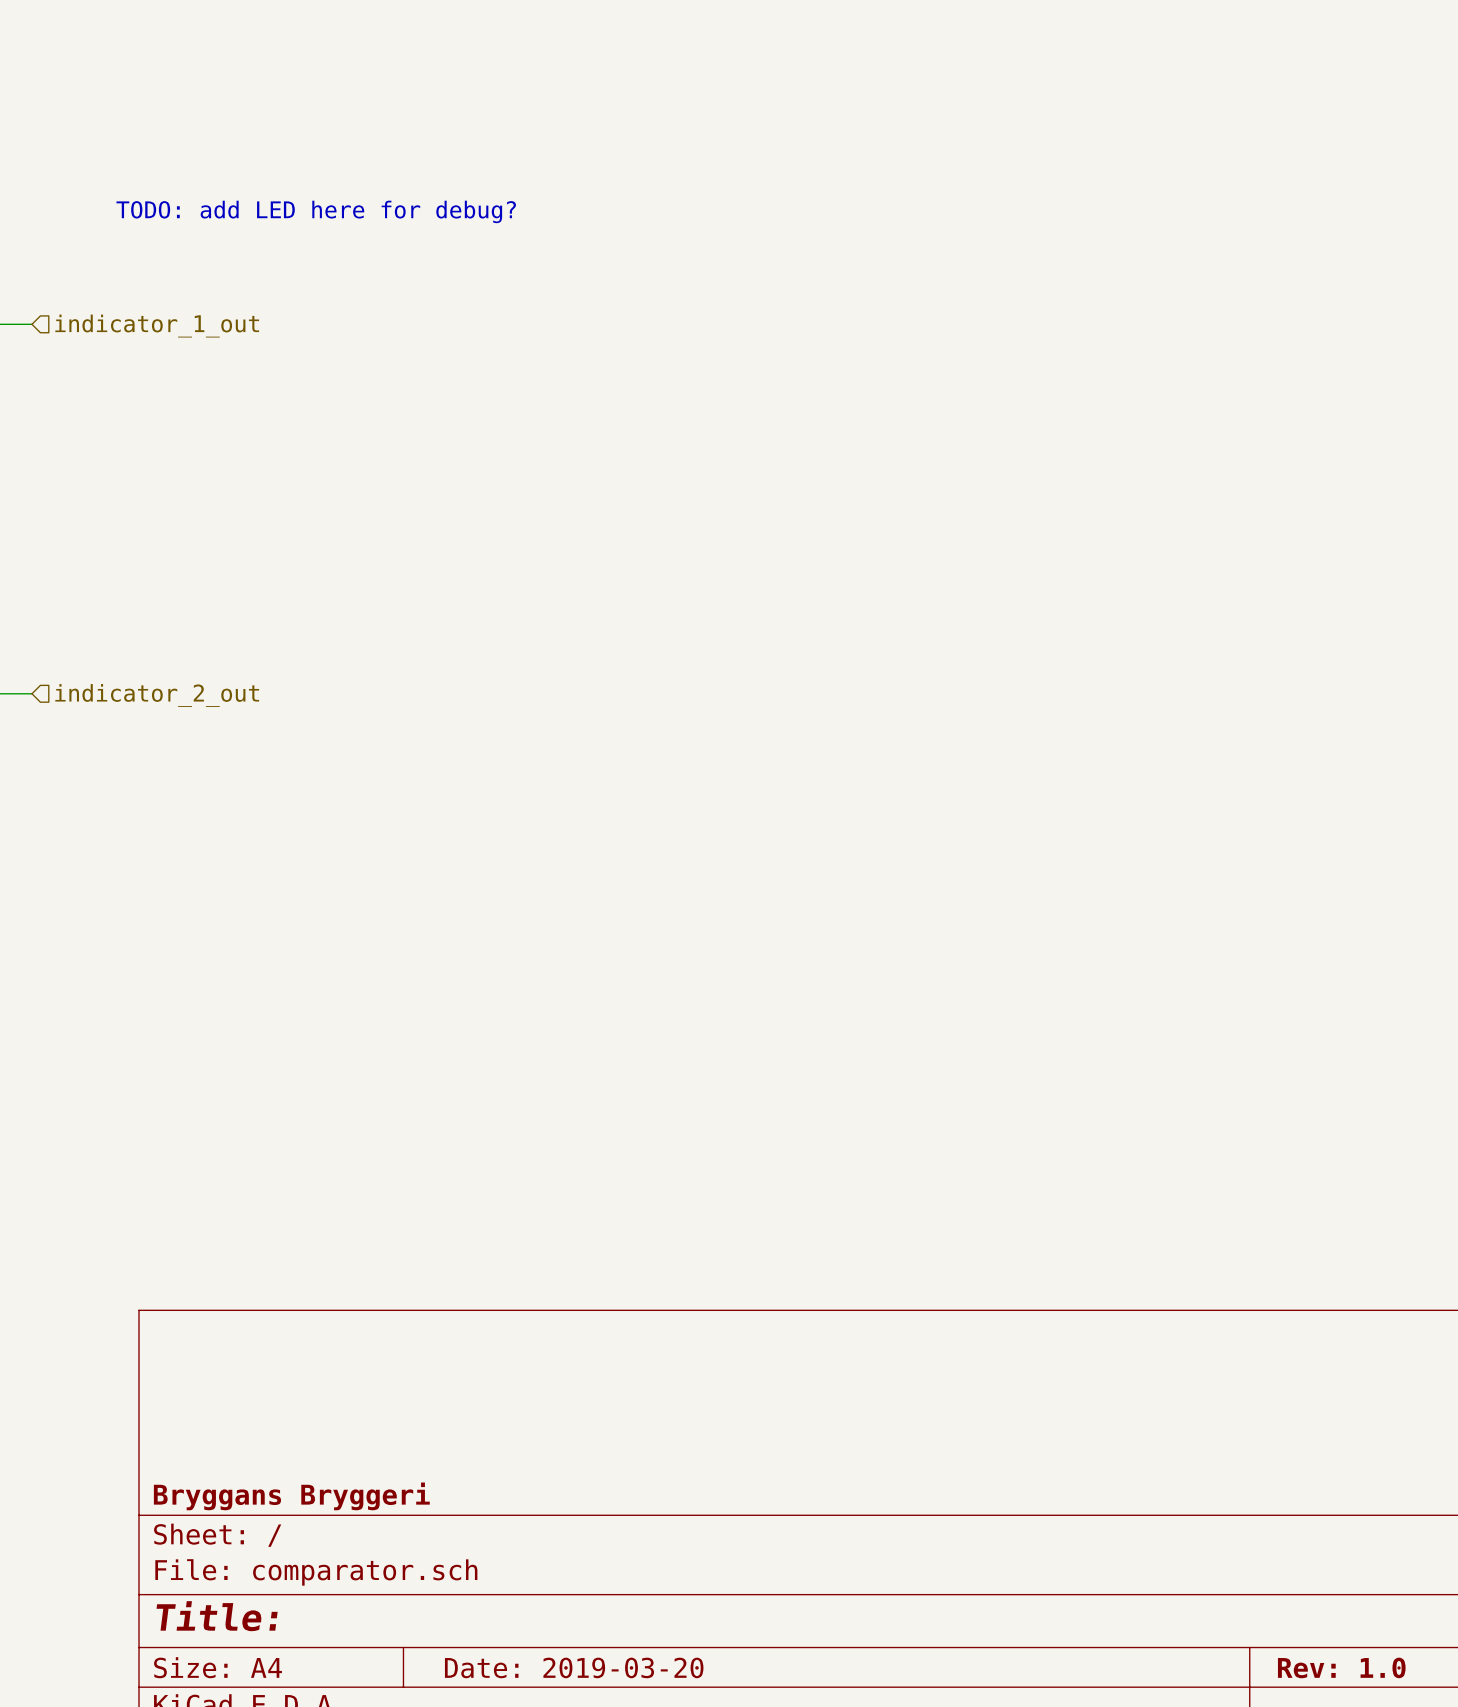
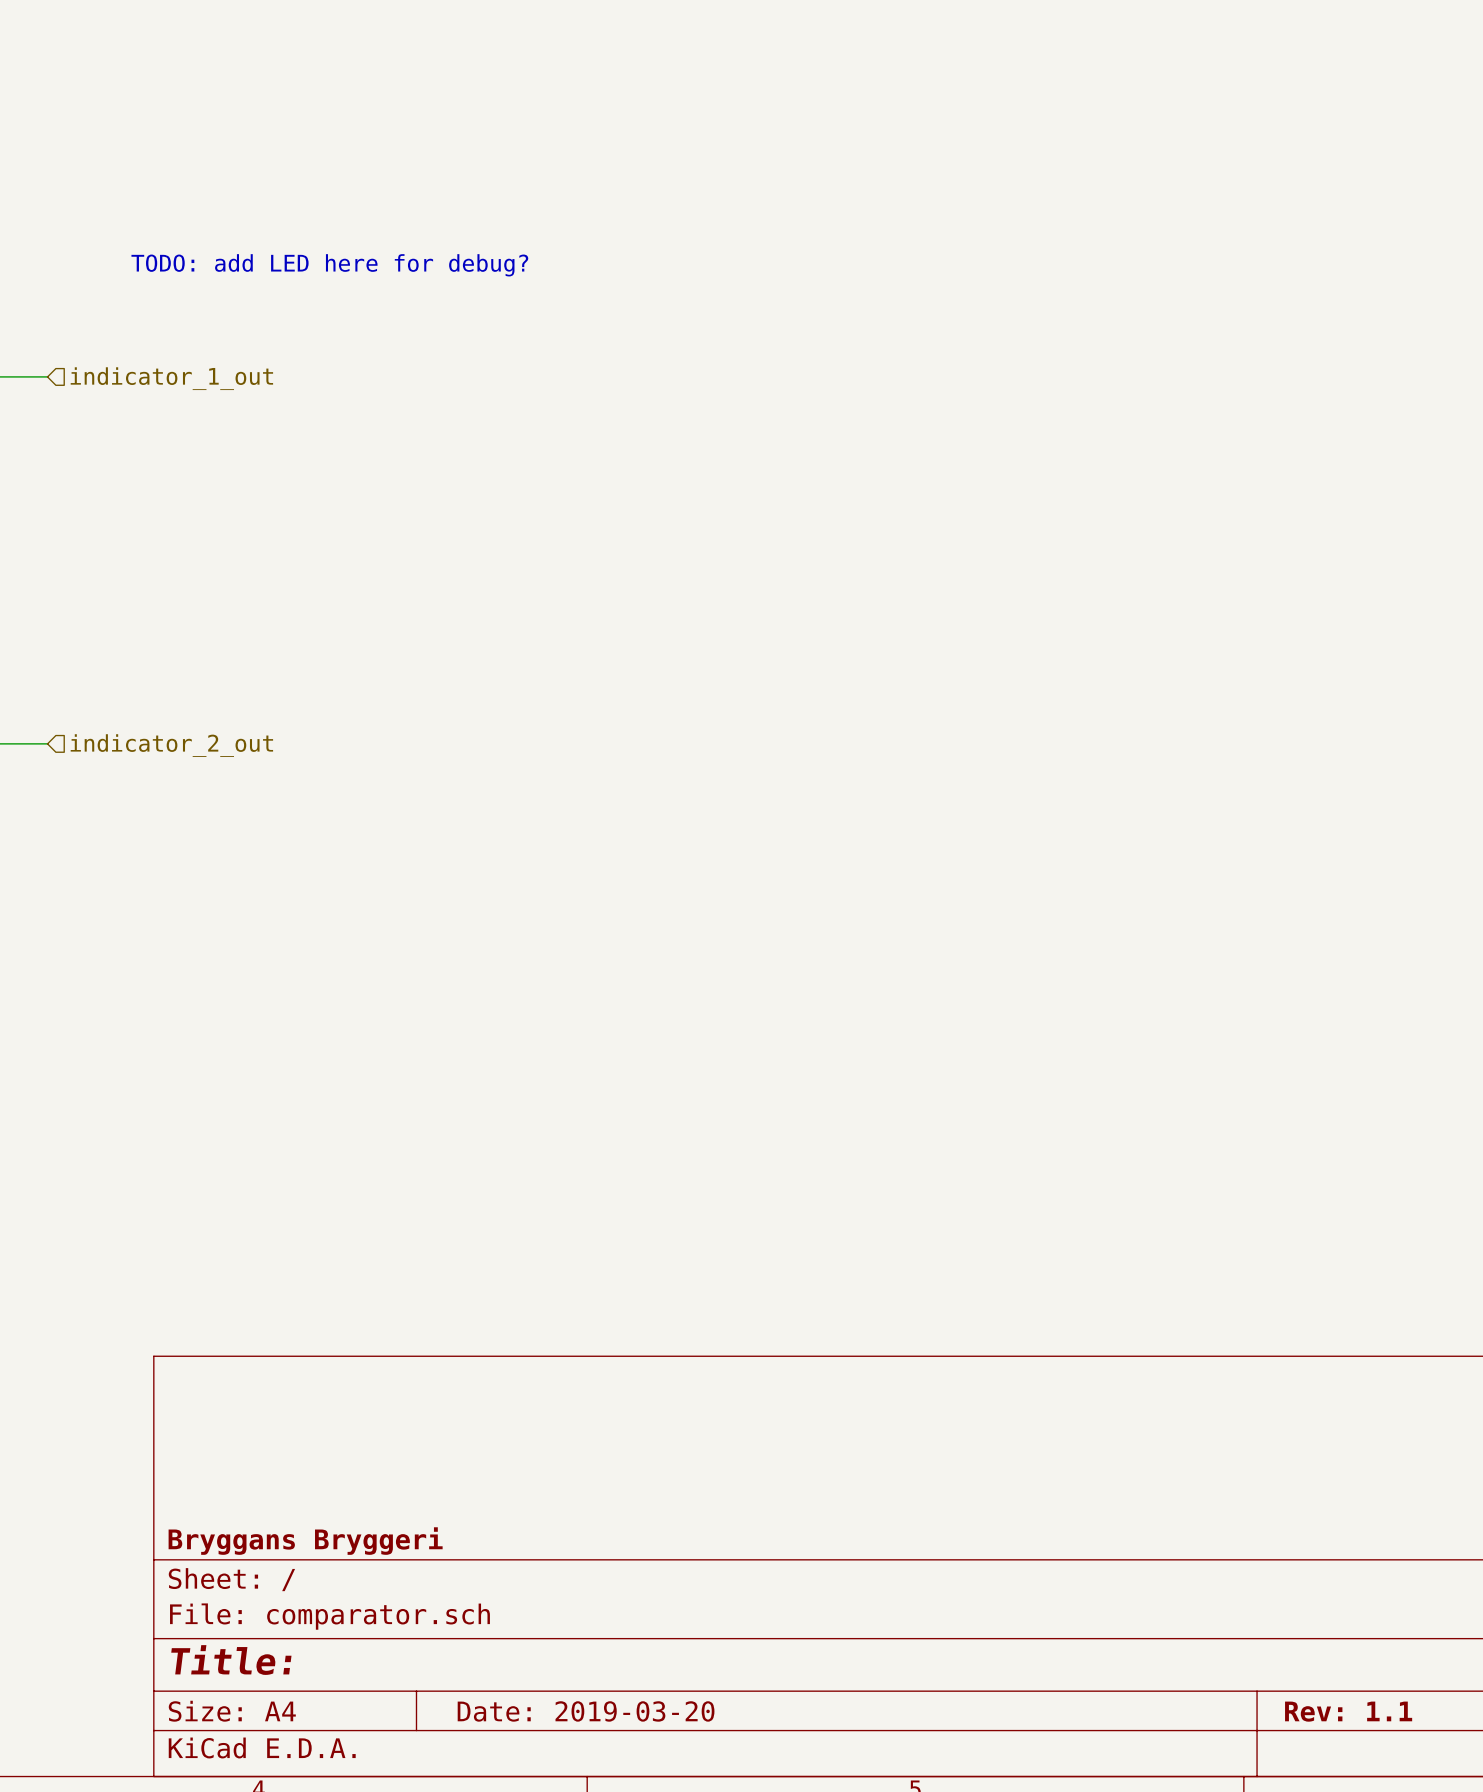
title block: Rev: 1.0 (1341, 1667) -> Rev: 1.1 (1348, 1711)

